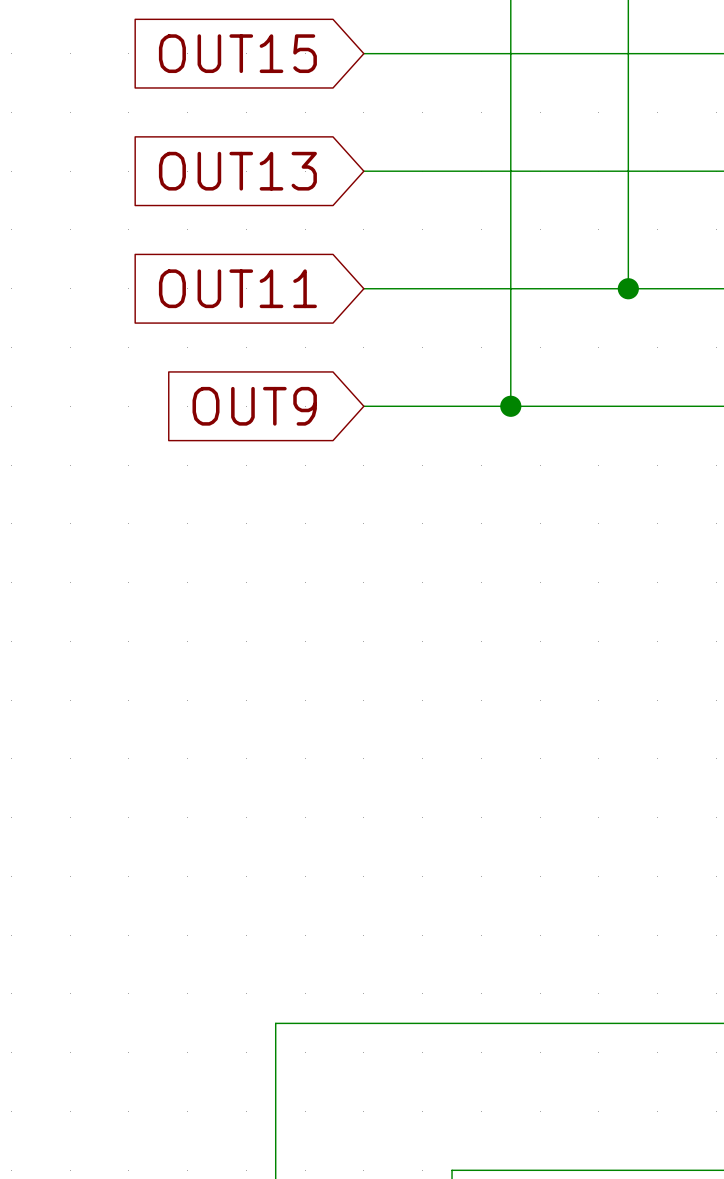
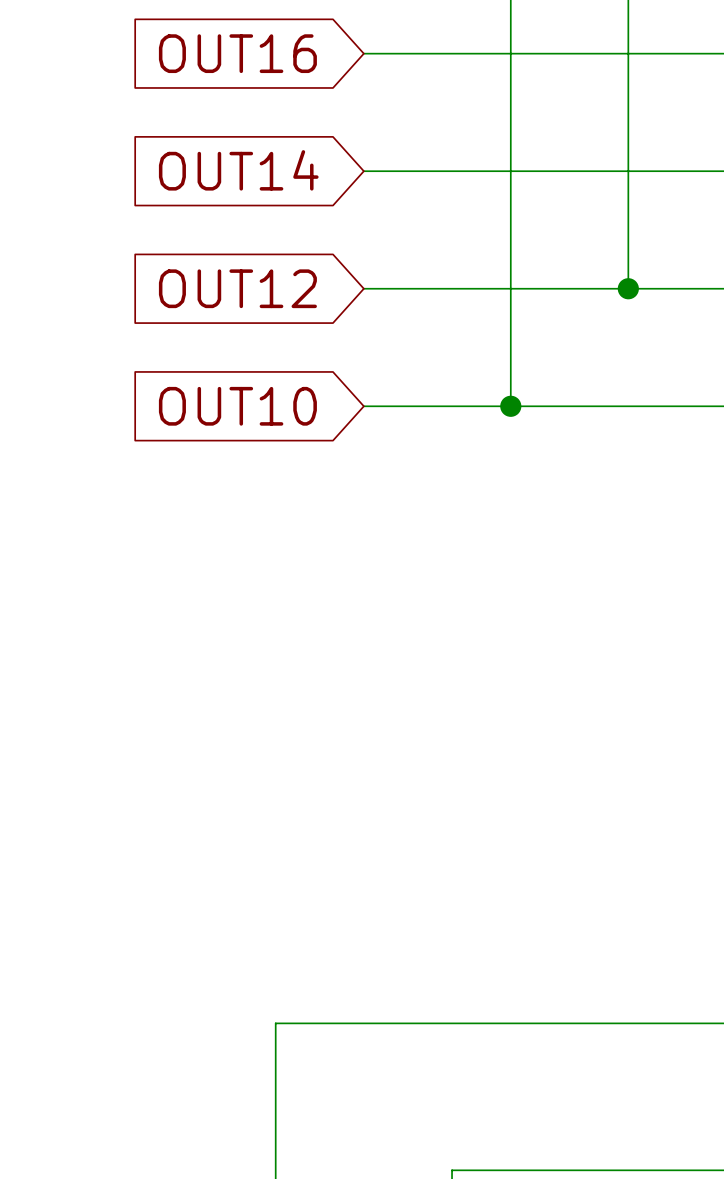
global label: OUT15 (237, 53) -> OUT16 (237, 53)
global label: OUT13 (237, 171) -> OUT14 (238, 170)
global label: OUT11 (237, 288) -> OUT12 (237, 288)
global label: OUT9 (254, 406) -> OUT10 (237, 406)

